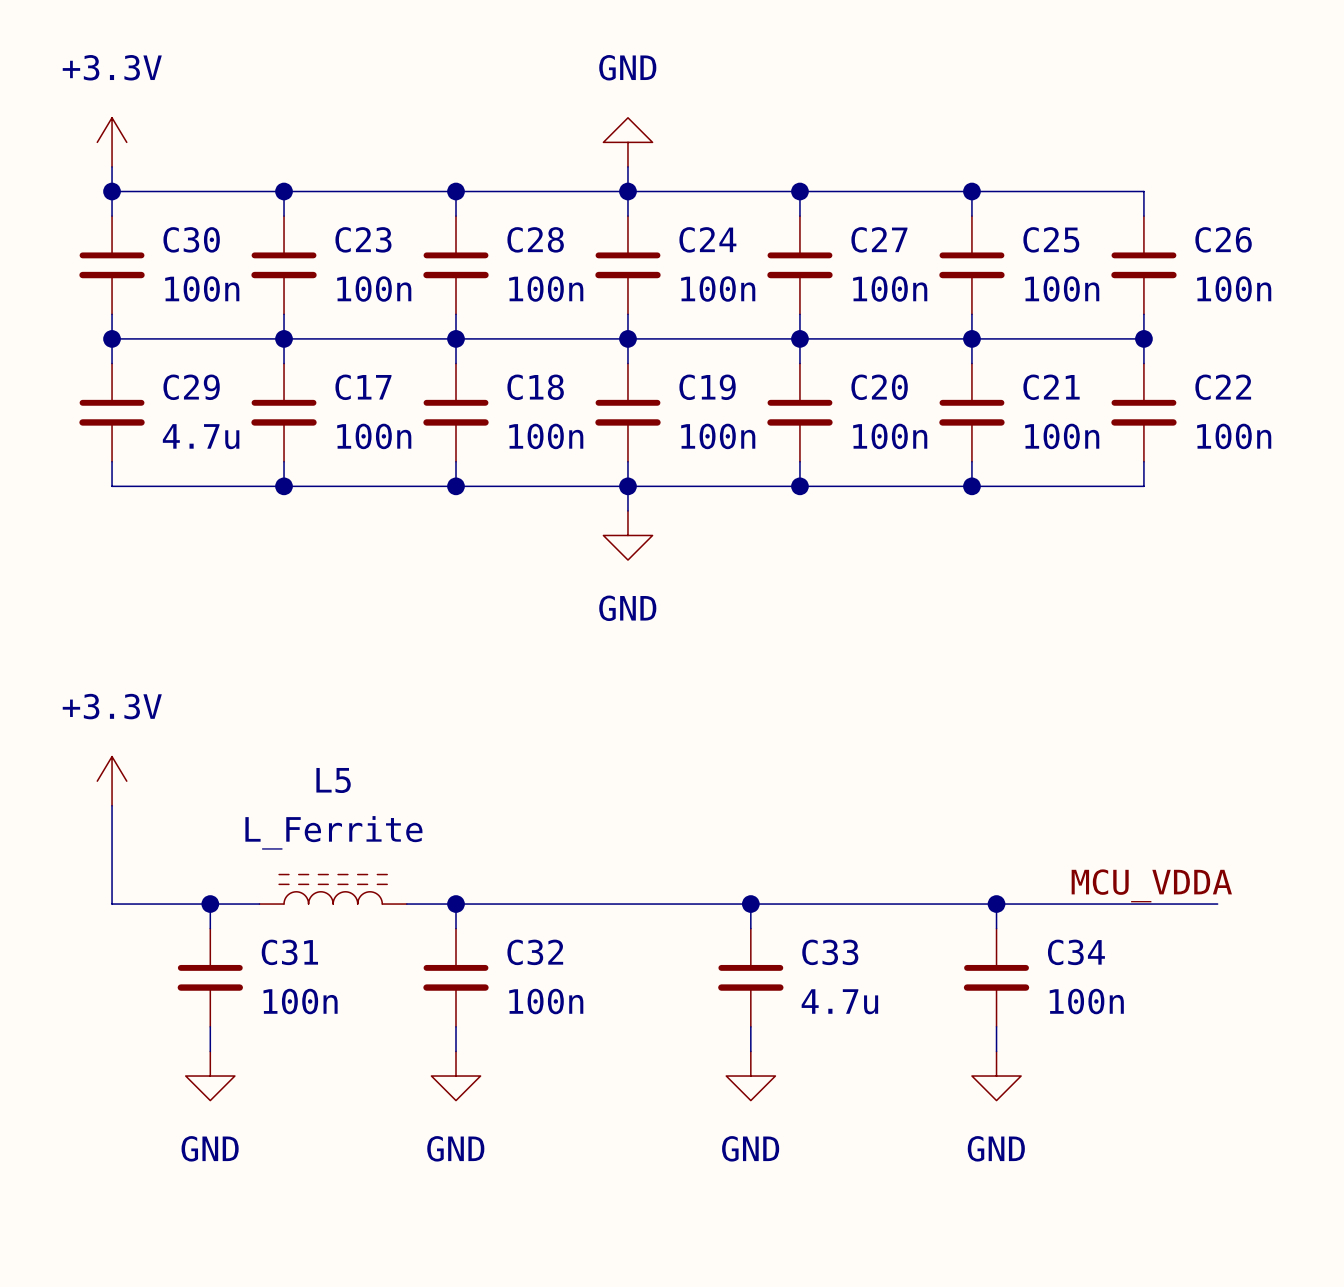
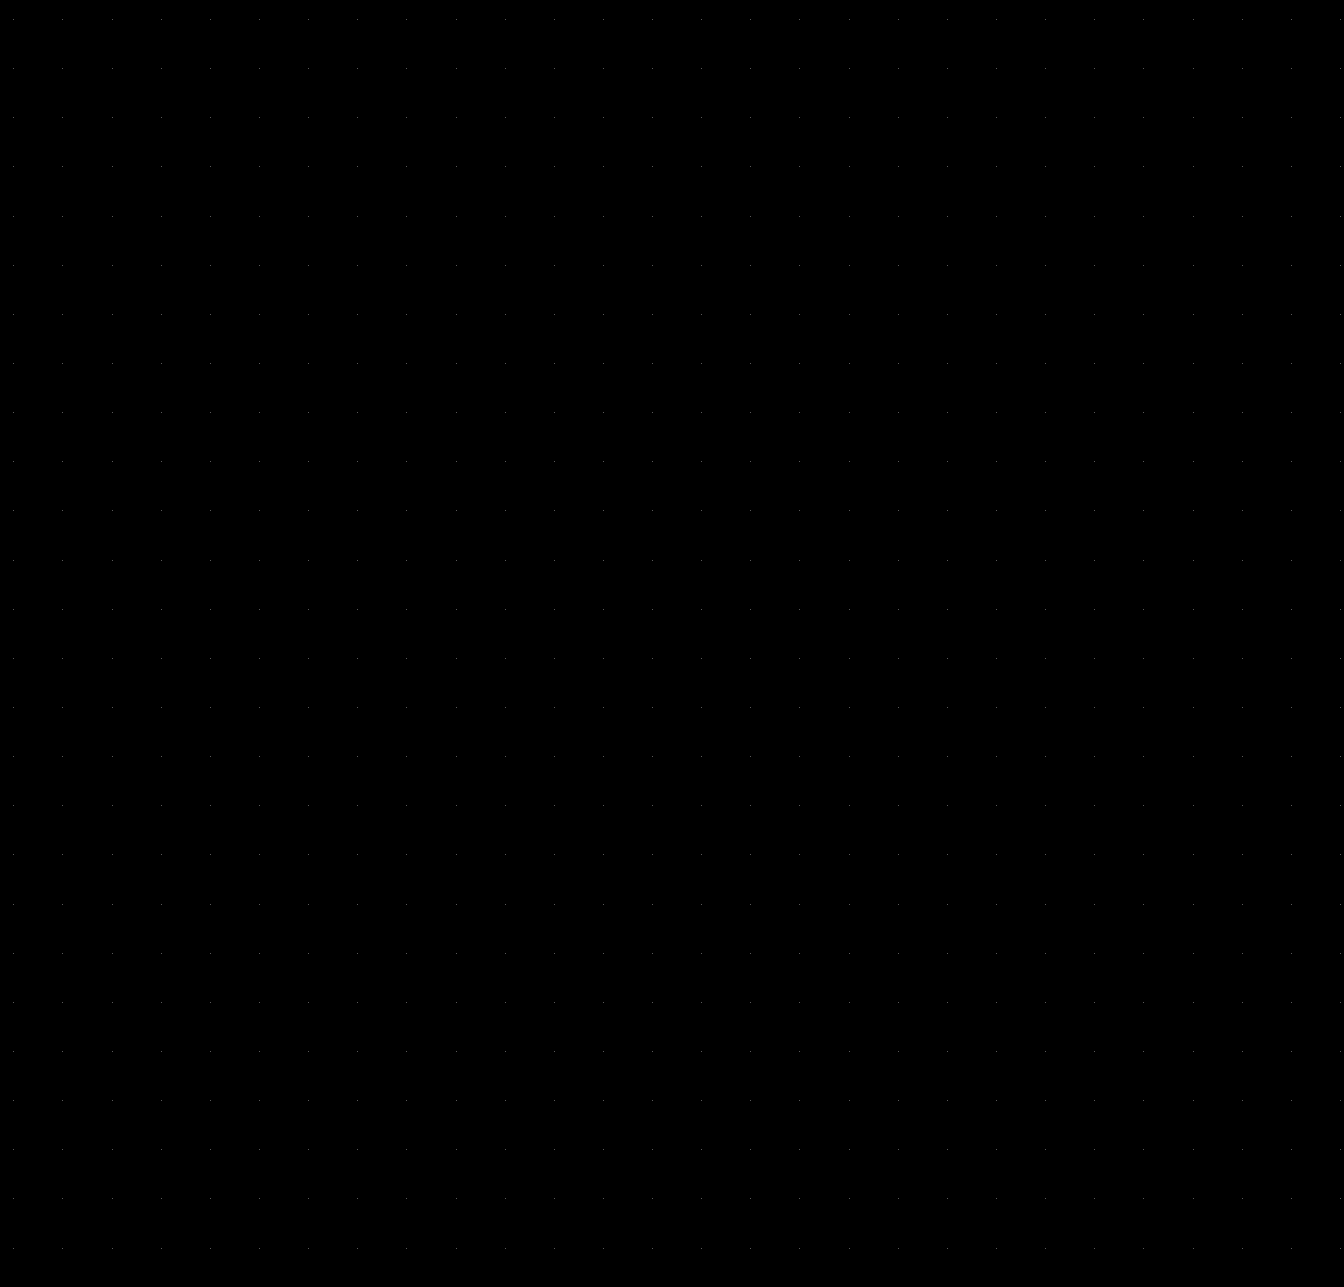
power symbol: +3.3V (112, 142) -> none
power symbol: GND (627, 142) -> none
wire: (112, 166) (112, 216) -> none
wire: (627, 166) (627, 216) -> none
wire: (112, 191) (1143, 191) (1143, 216) -> none
junction: (112, 191) -> none
wire: (284, 191) (284, 216) -> none
junction: (284, 191) -> none
wire: (456, 191) (456, 216) -> none
junction: (456, 191) -> none
junction: (627, 191) -> none
wire: (799, 191) (799, 216) -> none
junction: (799, 191) -> none
wire: (971, 191) (971, 216) -> none
junction: (971, 191) -> none
C30: 100n (112, 265) -> none
C23: 100n (284, 265) -> none
C28: 100n (456, 265) -> none
C24: 100n (627, 265) -> none
C27: 100n (799, 265) -> none
C25: 100n (971, 265) -> none
C26: 100n (1143, 265) -> none
wire: (112, 314) (112, 363) -> none
wire: (284, 314) (284, 363) -> none
wire: (456, 314) (456, 363) -> none
wire: (627, 314) (627, 363) -> none
wire: (799, 314) (799, 363) -> none
wire: (971, 314) (971, 363) -> none
wire: (1143, 314) (1143, 363) -> none
wire: (112, 338) (1143, 338) -> none
junction: (112, 338) -> none
junction: (284, 338) -> none
junction: (456, 338) -> none
junction: (627, 338) -> none
junction: (799, 338) -> none
junction: (971, 338) -> none
junction: (1143, 338) -> none
C29: 4.7u (112, 412) -> none
C17: 100n (284, 412) -> none
C18: 100n (456, 412) -> none
C19: 100n (627, 412) -> none
C20: 100n (799, 412) -> none
C21: 100n (971, 412) -> none
C22: 100n (1143, 412) -> none
wire: (112, 461) (112, 486) (1143, 486) (1143, 461) -> none
wire: (284, 461) (284, 486) -> none
wire: (456, 461) (456, 486) -> none
wire: (627, 461) (627, 510) -> none
wire: (799, 461) (799, 486) -> none
wire: (971, 461) (971, 486) -> none
junction: (284, 486) -> none
junction: (456, 486) -> none
junction: (627, 486) -> none
junction: (799, 486) -> none
junction: (971, 486) -> none
power symbol: GND (627, 535) -> none
power symbol: +3.3V (112, 781) -> none
wire: (112, 805) (112, 904) (259, 904) -> none
label: MCU_VDDA (1151, 885) -> none
L5: L_Ferrite (333, 889) -> none
wire: (210, 904) (210, 928) -> none
junction: (210, 904) -> none
wire: (406, 904) (1217, 904) -> none
wire: (456, 904) (456, 928) -> none
junction: (456, 904) -> none
wire: (750, 904) (750, 928) -> none
junction: (750, 904) -> none
wire: (996, 904) (996, 928) -> none
junction: (996, 904) -> none
C31: 100n (210, 977) -> none
C32: 100n (456, 977) -> none
C33: 4.7u (750, 977) -> none
C34: 100n (996, 977) -> none
wire: (210, 1026) (210, 1051) -> none
wire: (456, 1026) (456, 1051) -> none
wire: (750, 1026) (750, 1051) -> none
wire: (996, 1026) (996, 1051) -> none
power symbol: GND (210, 1076) -> none
power symbol: GND (456, 1076) -> none
power symbol: GND (750, 1076) -> none
power symbol: GND (996, 1076) -> none

